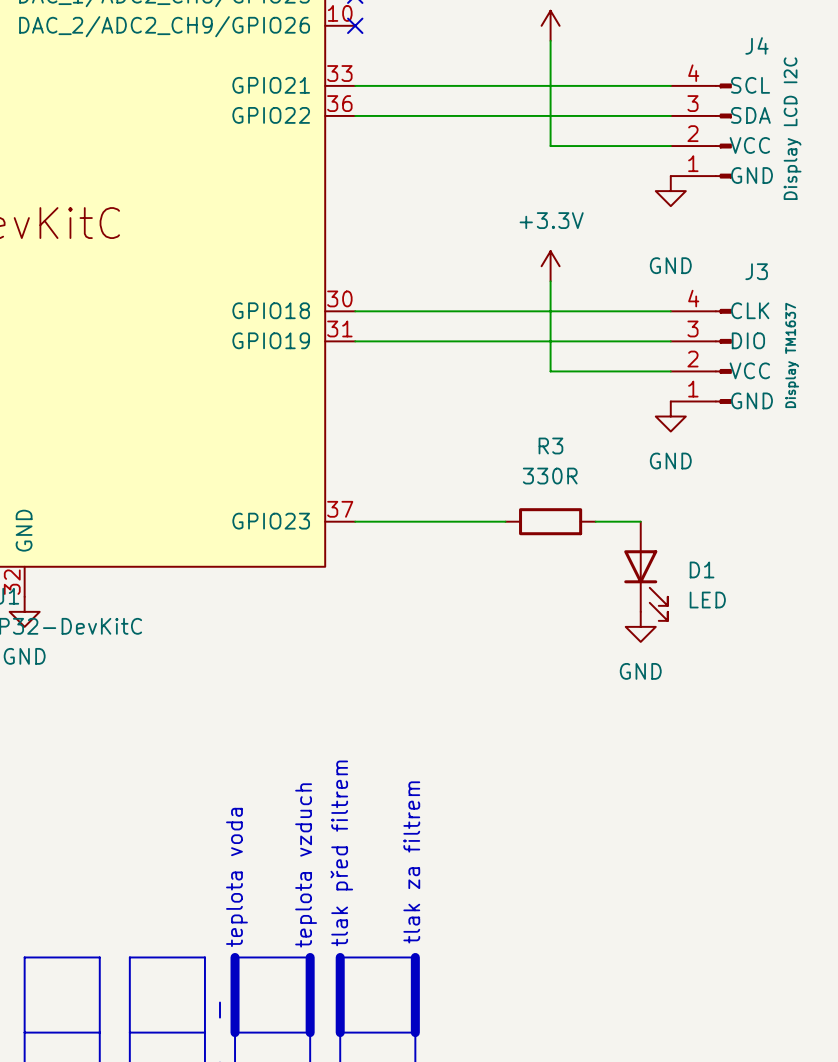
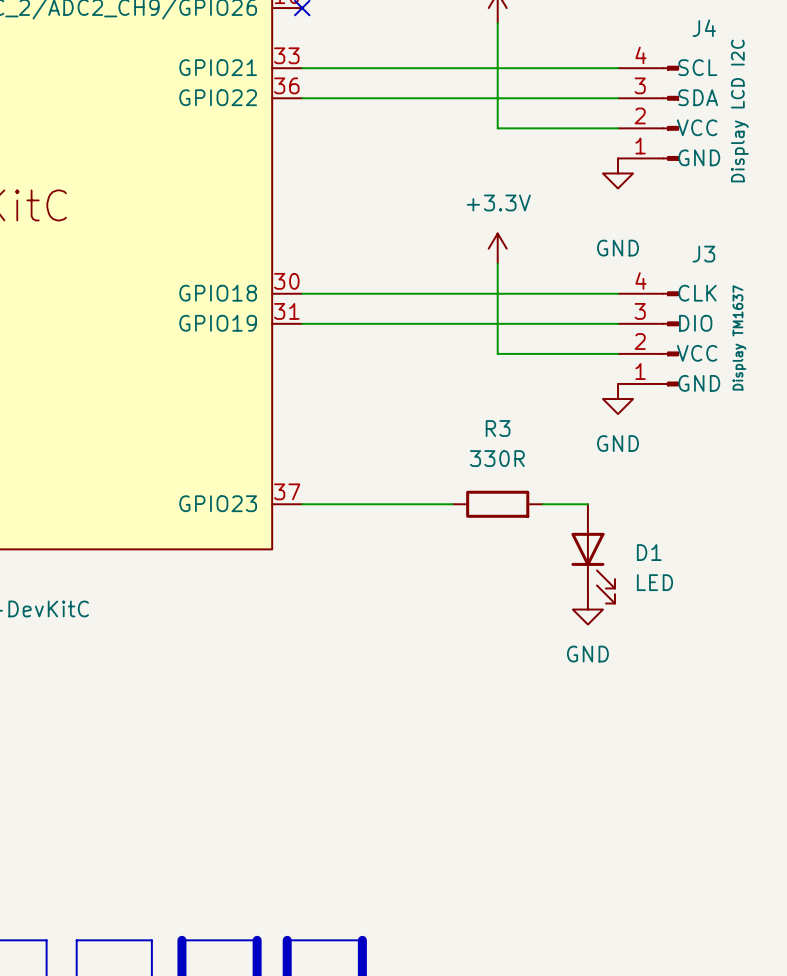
text: tlak před filtrem (341, 853) -> none
text: tlak za filtrem (411, 862) -> none
text: teplota vzduch (306, 865) -> none
text: teplota voda (236, 877) -> none

